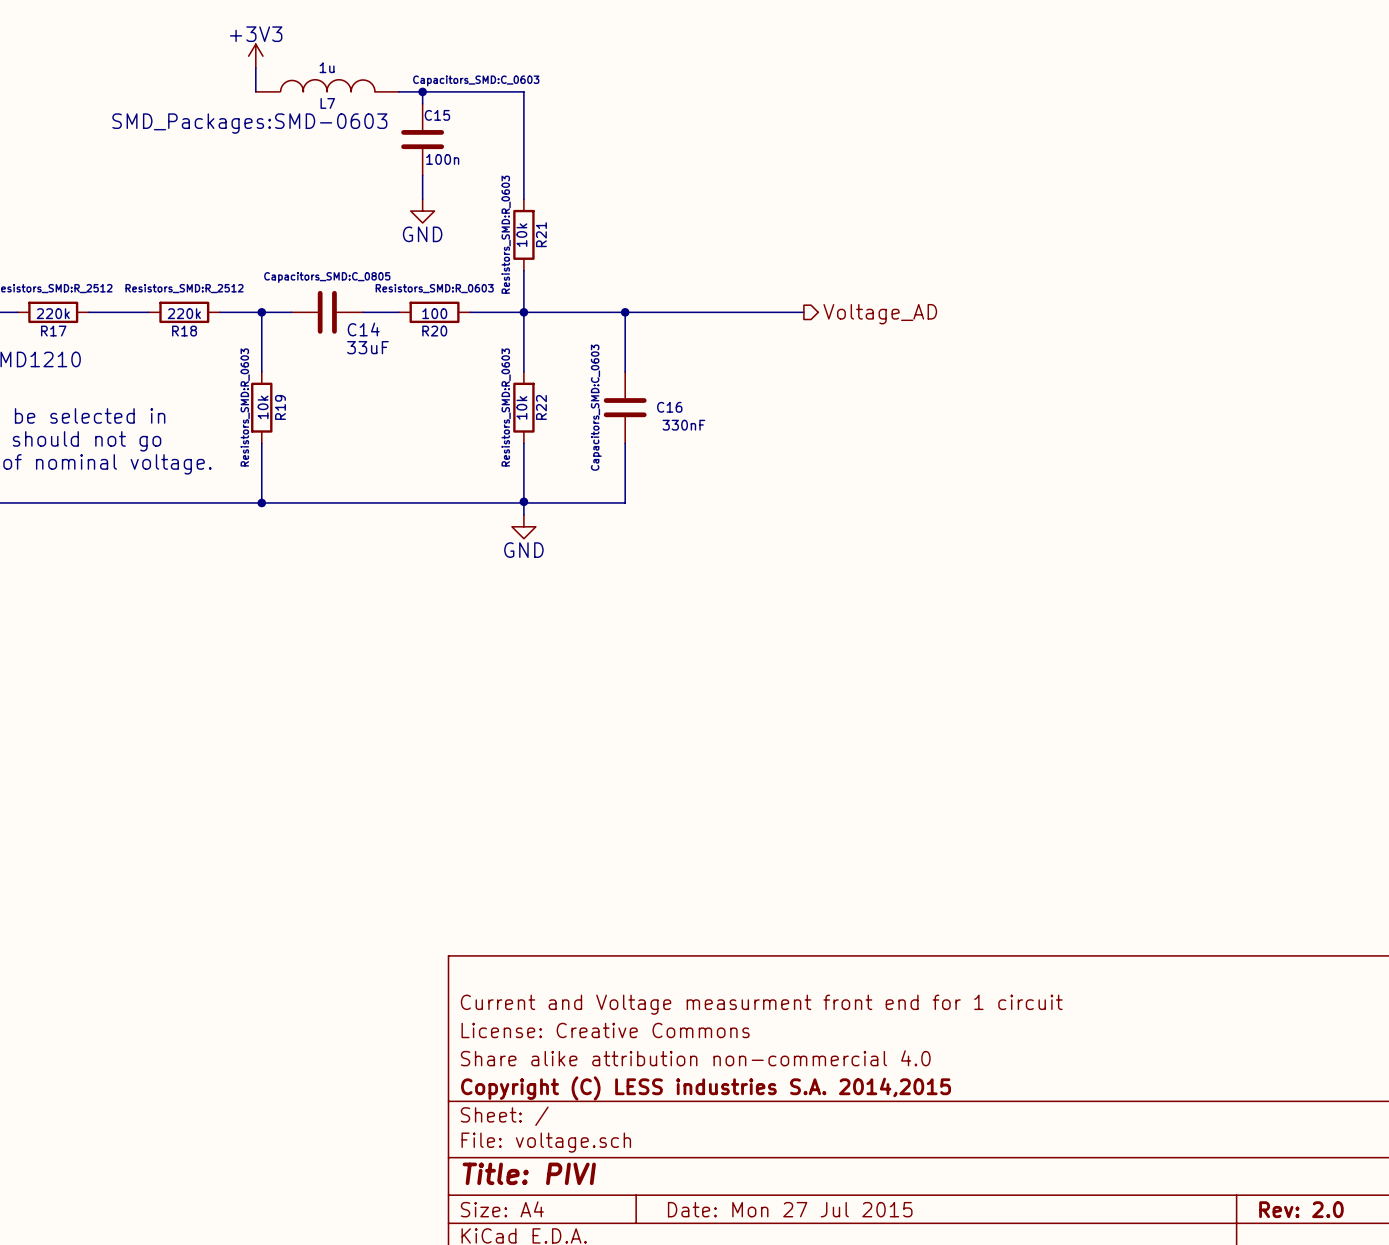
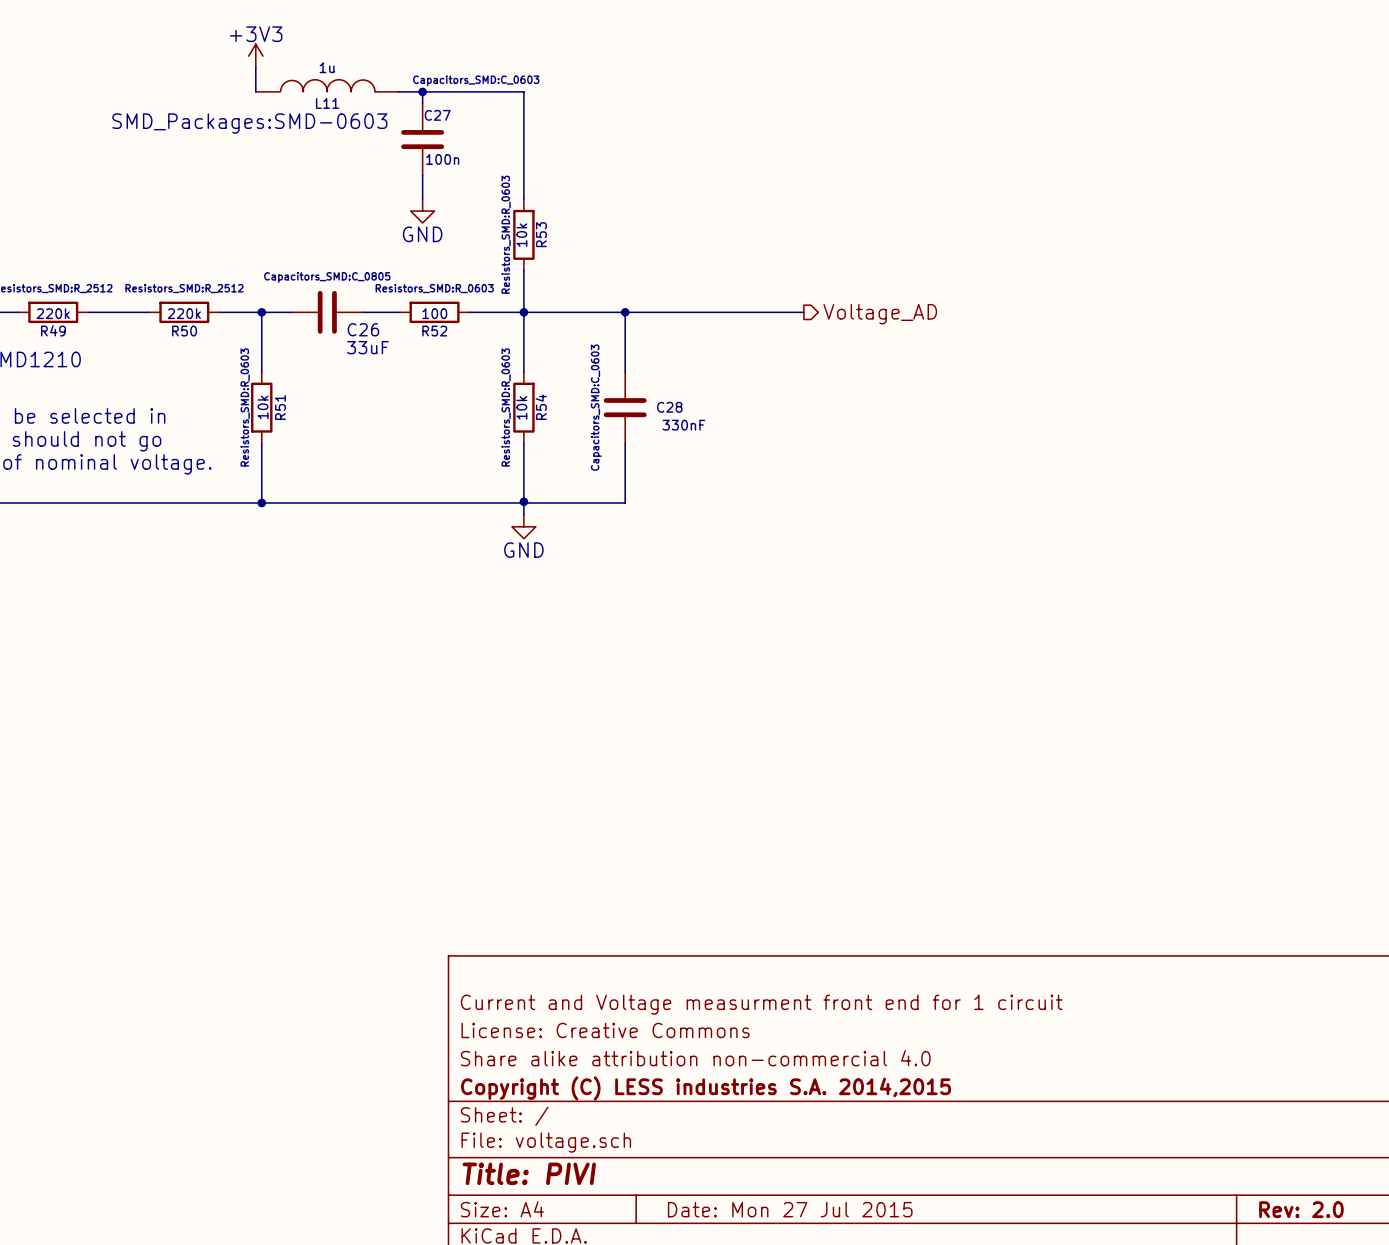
L7 name: L7 (327, 103) -> L11 (327, 103)
C15 name: C15 (437, 115) -> C27 (437, 115)
R21 name: R21 (541, 234) -> R53 (541, 234)
C14 name: C14 (363, 329) -> C26 (363, 329)
R17 name: R17 (53, 331) -> R49 (53, 330)
R18 name: R18 (184, 331) -> R50 (184, 331)
R20 name: R20 (434, 331) -> R52 (434, 331)
R19 name: R19 (280, 407) -> R51 (280, 407)
R22 name: R22 (541, 407) -> R54 (541, 407)
C16 name: C16 (669, 407) -> C28 (669, 407)

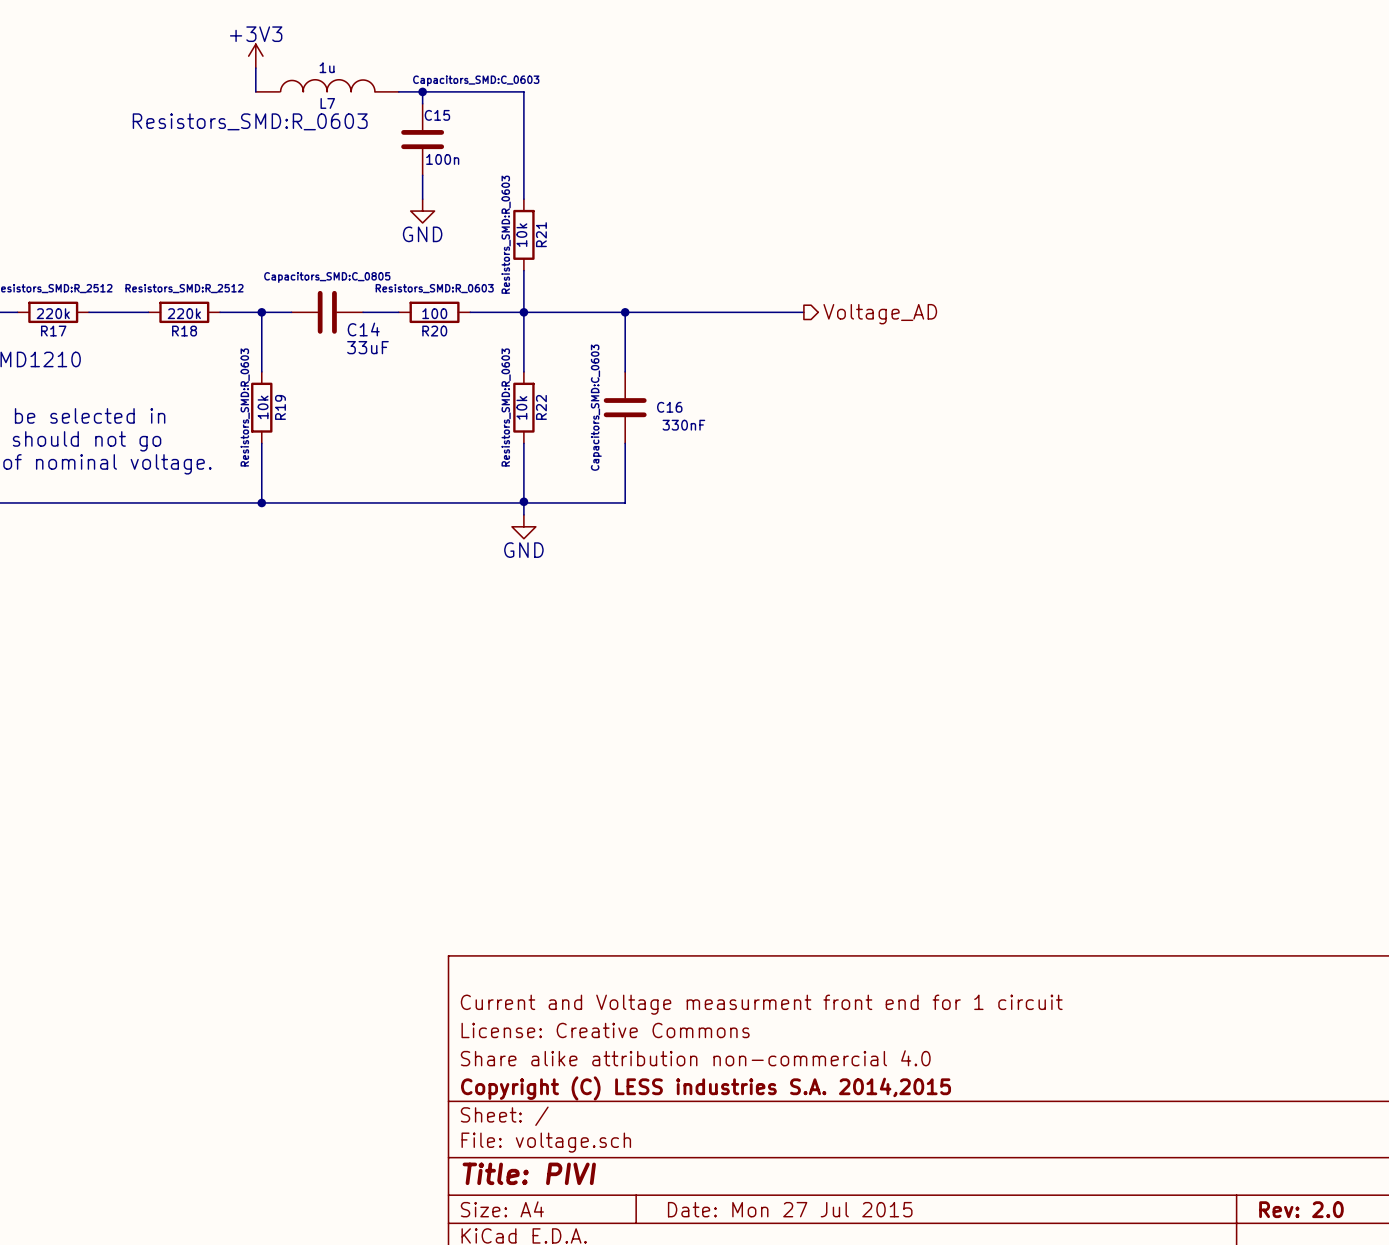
L11 name: L11 (327, 103) -> L7 (327, 103)
C27 name: C27 (437, 115) -> C15 (437, 115)
L11 text: SMD_Packages:SMD-0603 (249, 123) -> Resistors_SMD:R_0603 (250, 121)
R53 name: R53 (541, 234) -> R21 (541, 234)
C26 name: C26 (363, 329) -> C14 (363, 329)
R49 name: R49 (53, 330) -> R17 (53, 331)
R50 name: R50 (184, 331) -> R18 (184, 331)
R52 name: R52 (434, 331) -> R20 (434, 331)
R51 name: R51 (280, 407) -> R19 (280, 407)
R54 name: R54 (541, 407) -> R22 (541, 407)
C28 name: C28 (669, 407) -> C16 (669, 407)

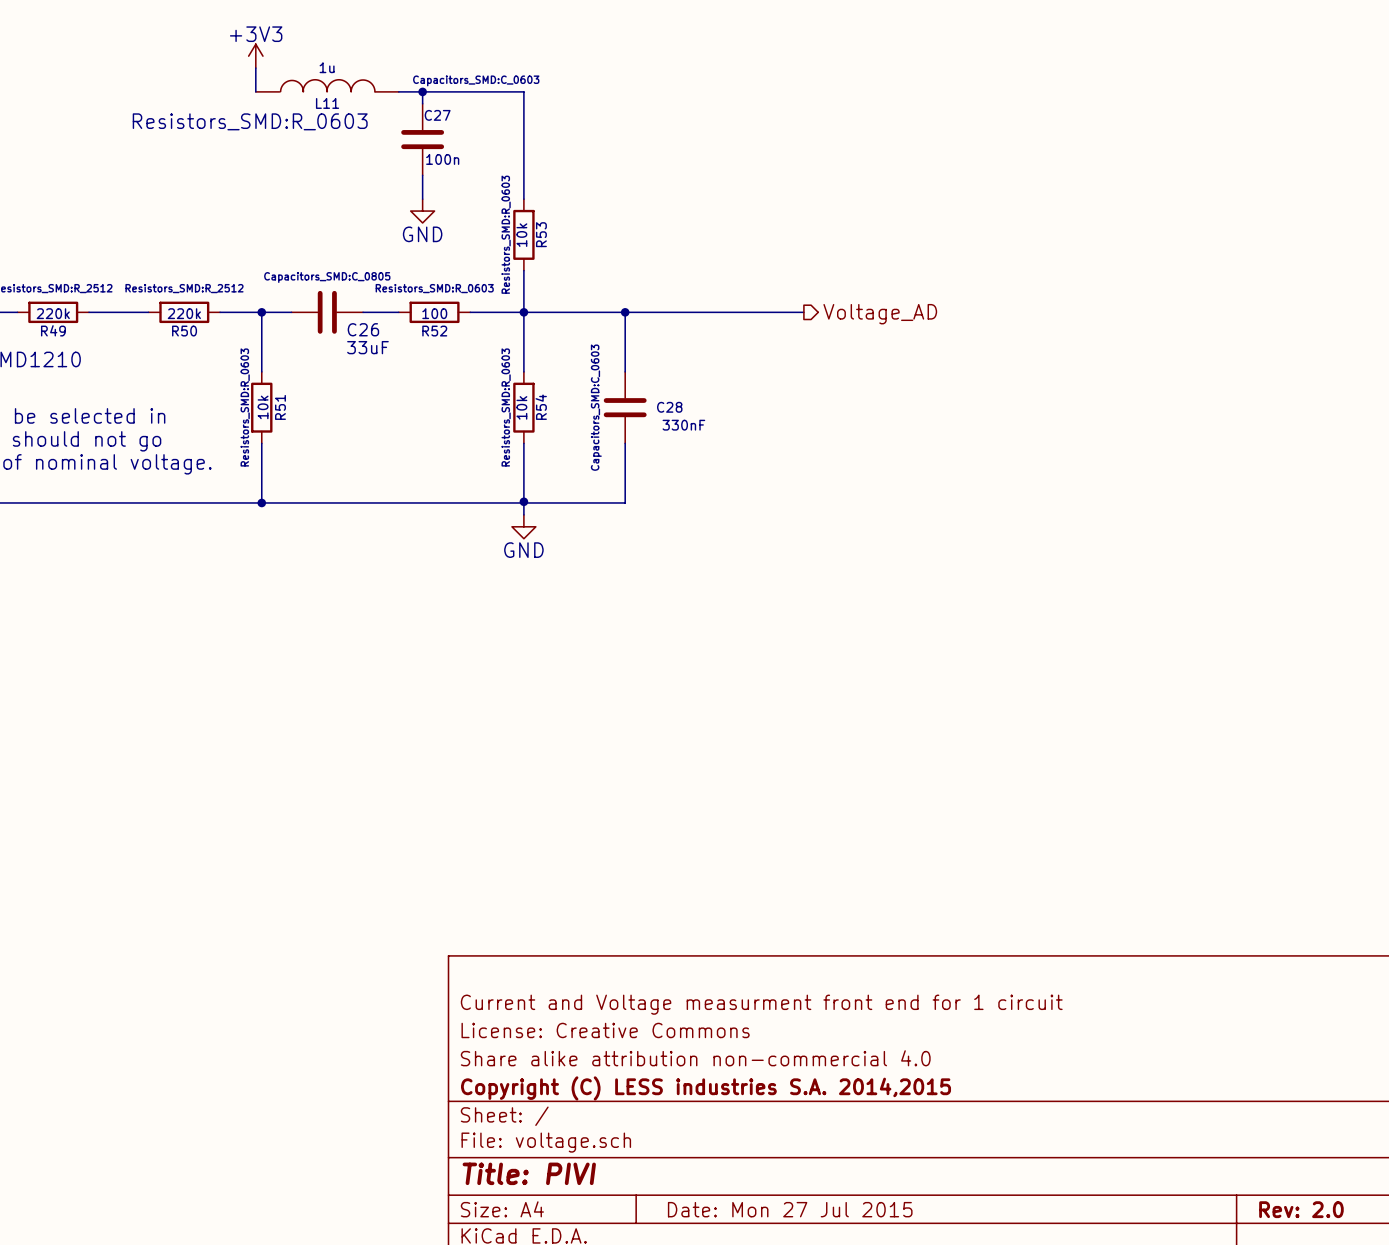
L7 name: L7 (327, 103) -> L11 (327, 103)
C15 name: C15 (437, 115) -> C27 (437, 115)
R21 name: R21 (541, 234) -> R53 (541, 234)
C14 name: C14 (363, 329) -> C26 (363, 329)
R17 name: R17 (53, 331) -> R49 (53, 330)
R18 name: R18 (184, 331) -> R50 (184, 331)
R20 name: R20 (434, 331) -> R52 (434, 331)
R19 name: R19 (280, 407) -> R51 (280, 407)
R22 name: R22 (541, 407) -> R54 (541, 407)
C16 name: C16 (669, 407) -> C28 (669, 407)

